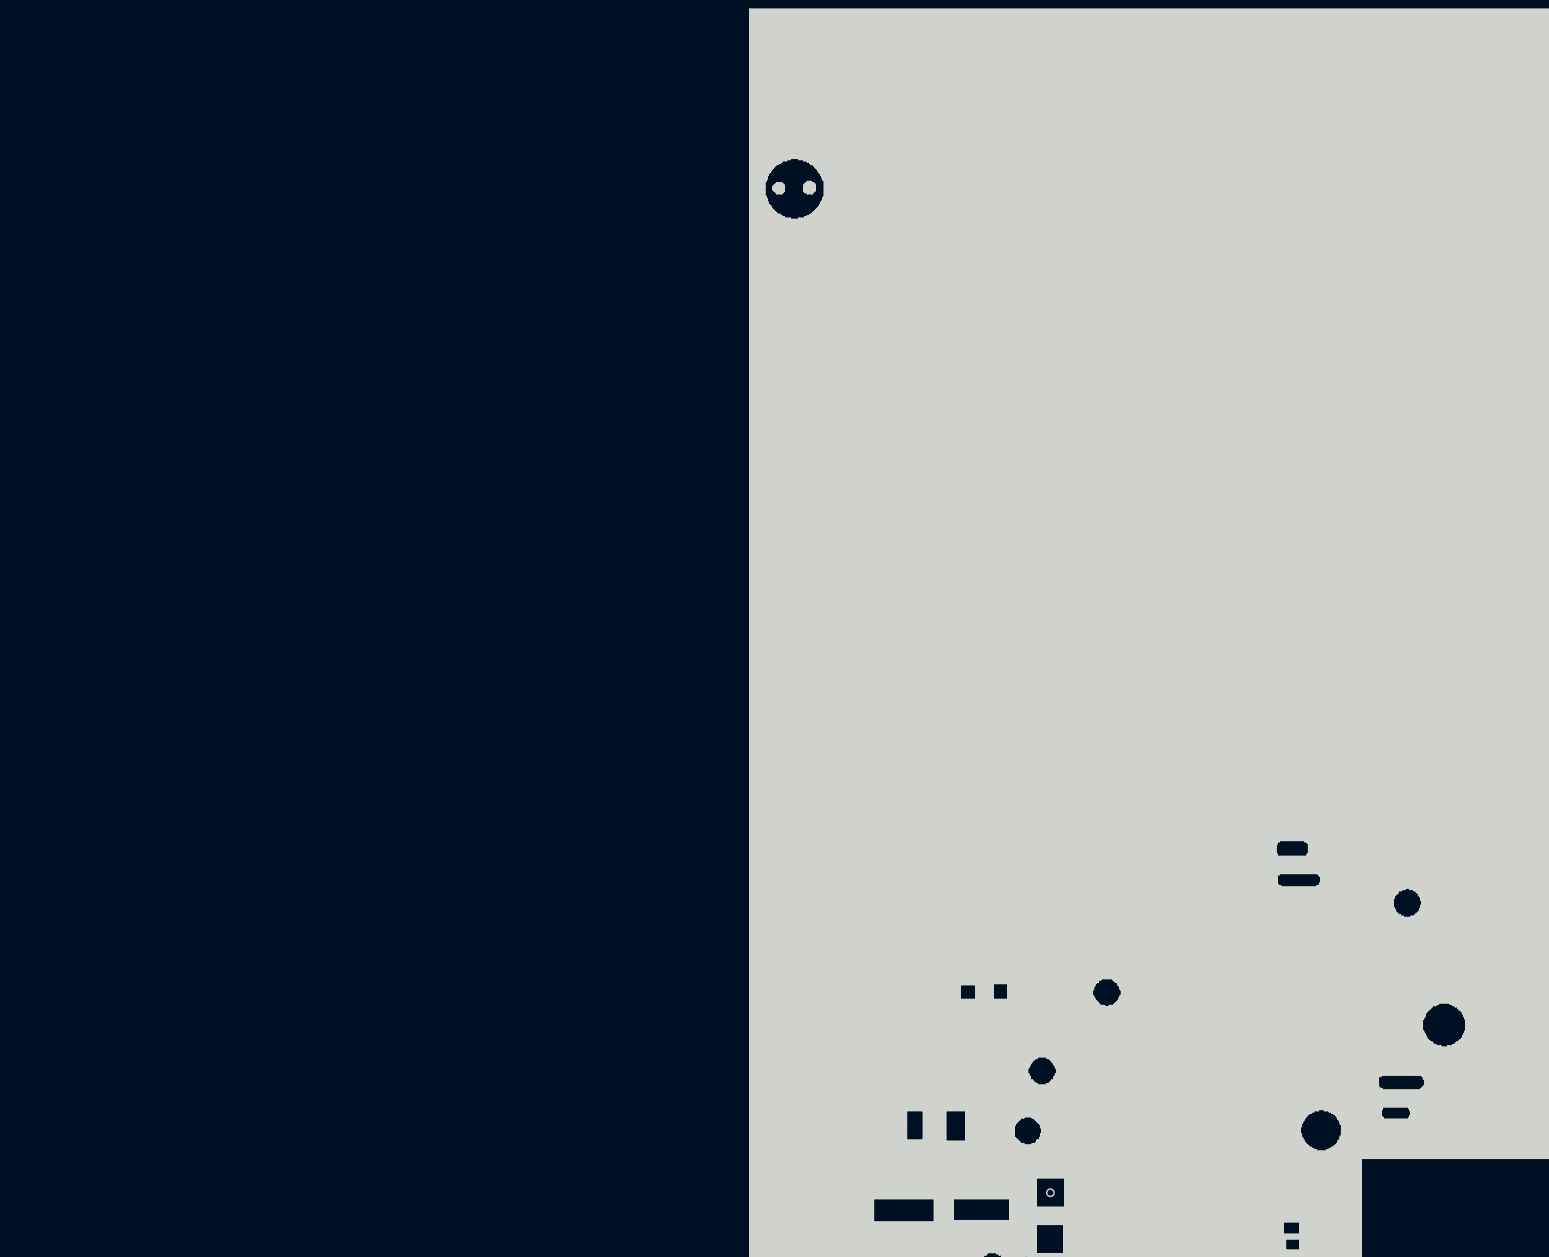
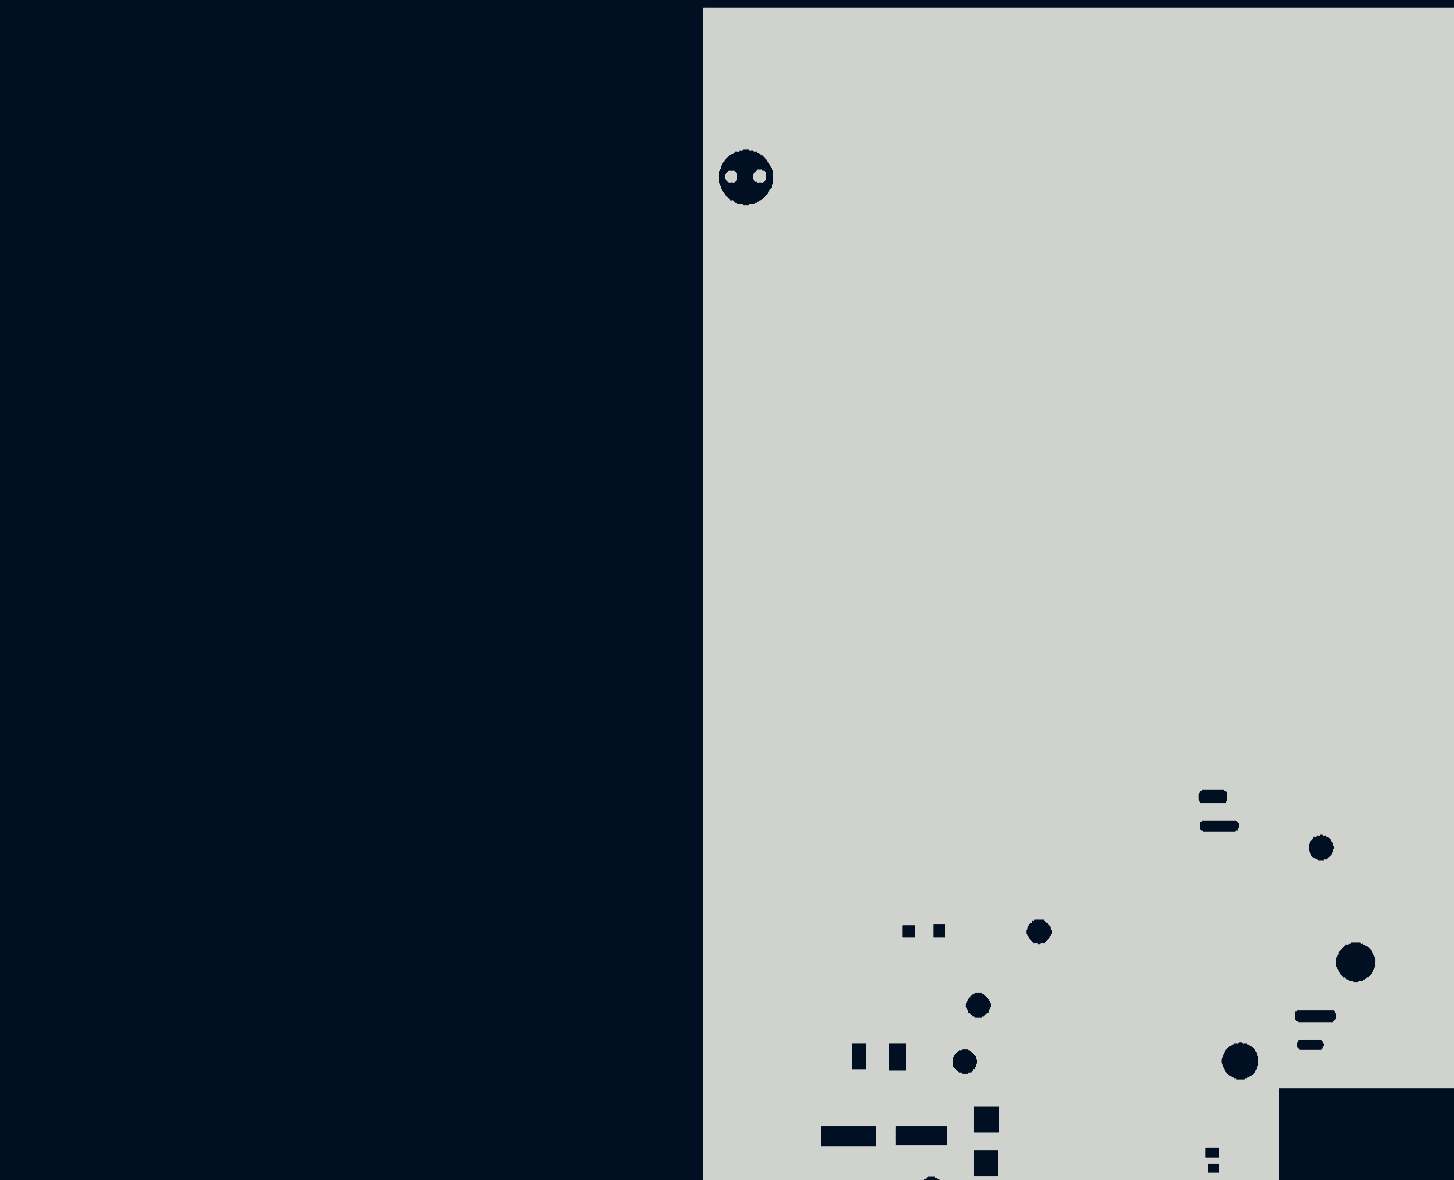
hole: (1050, 1192) -> none

